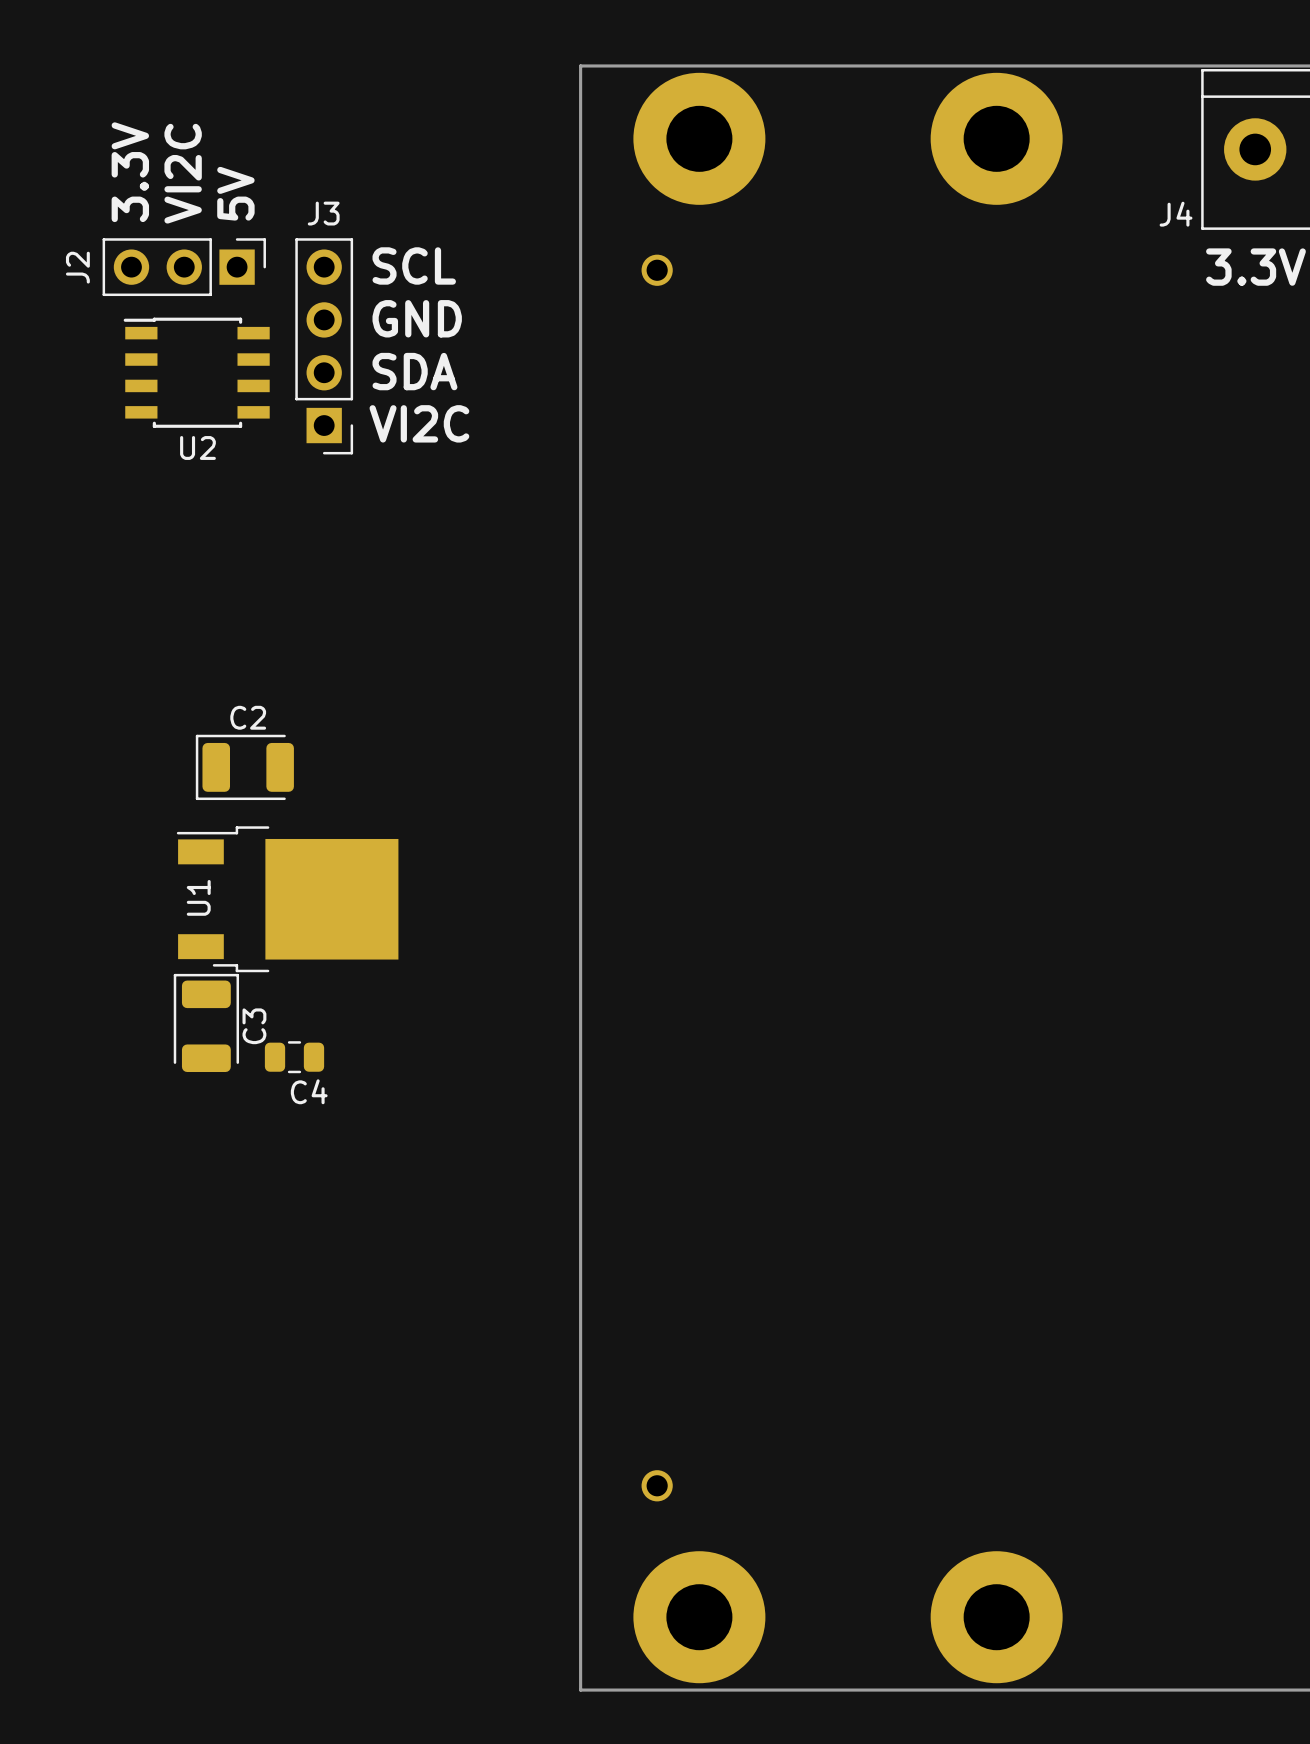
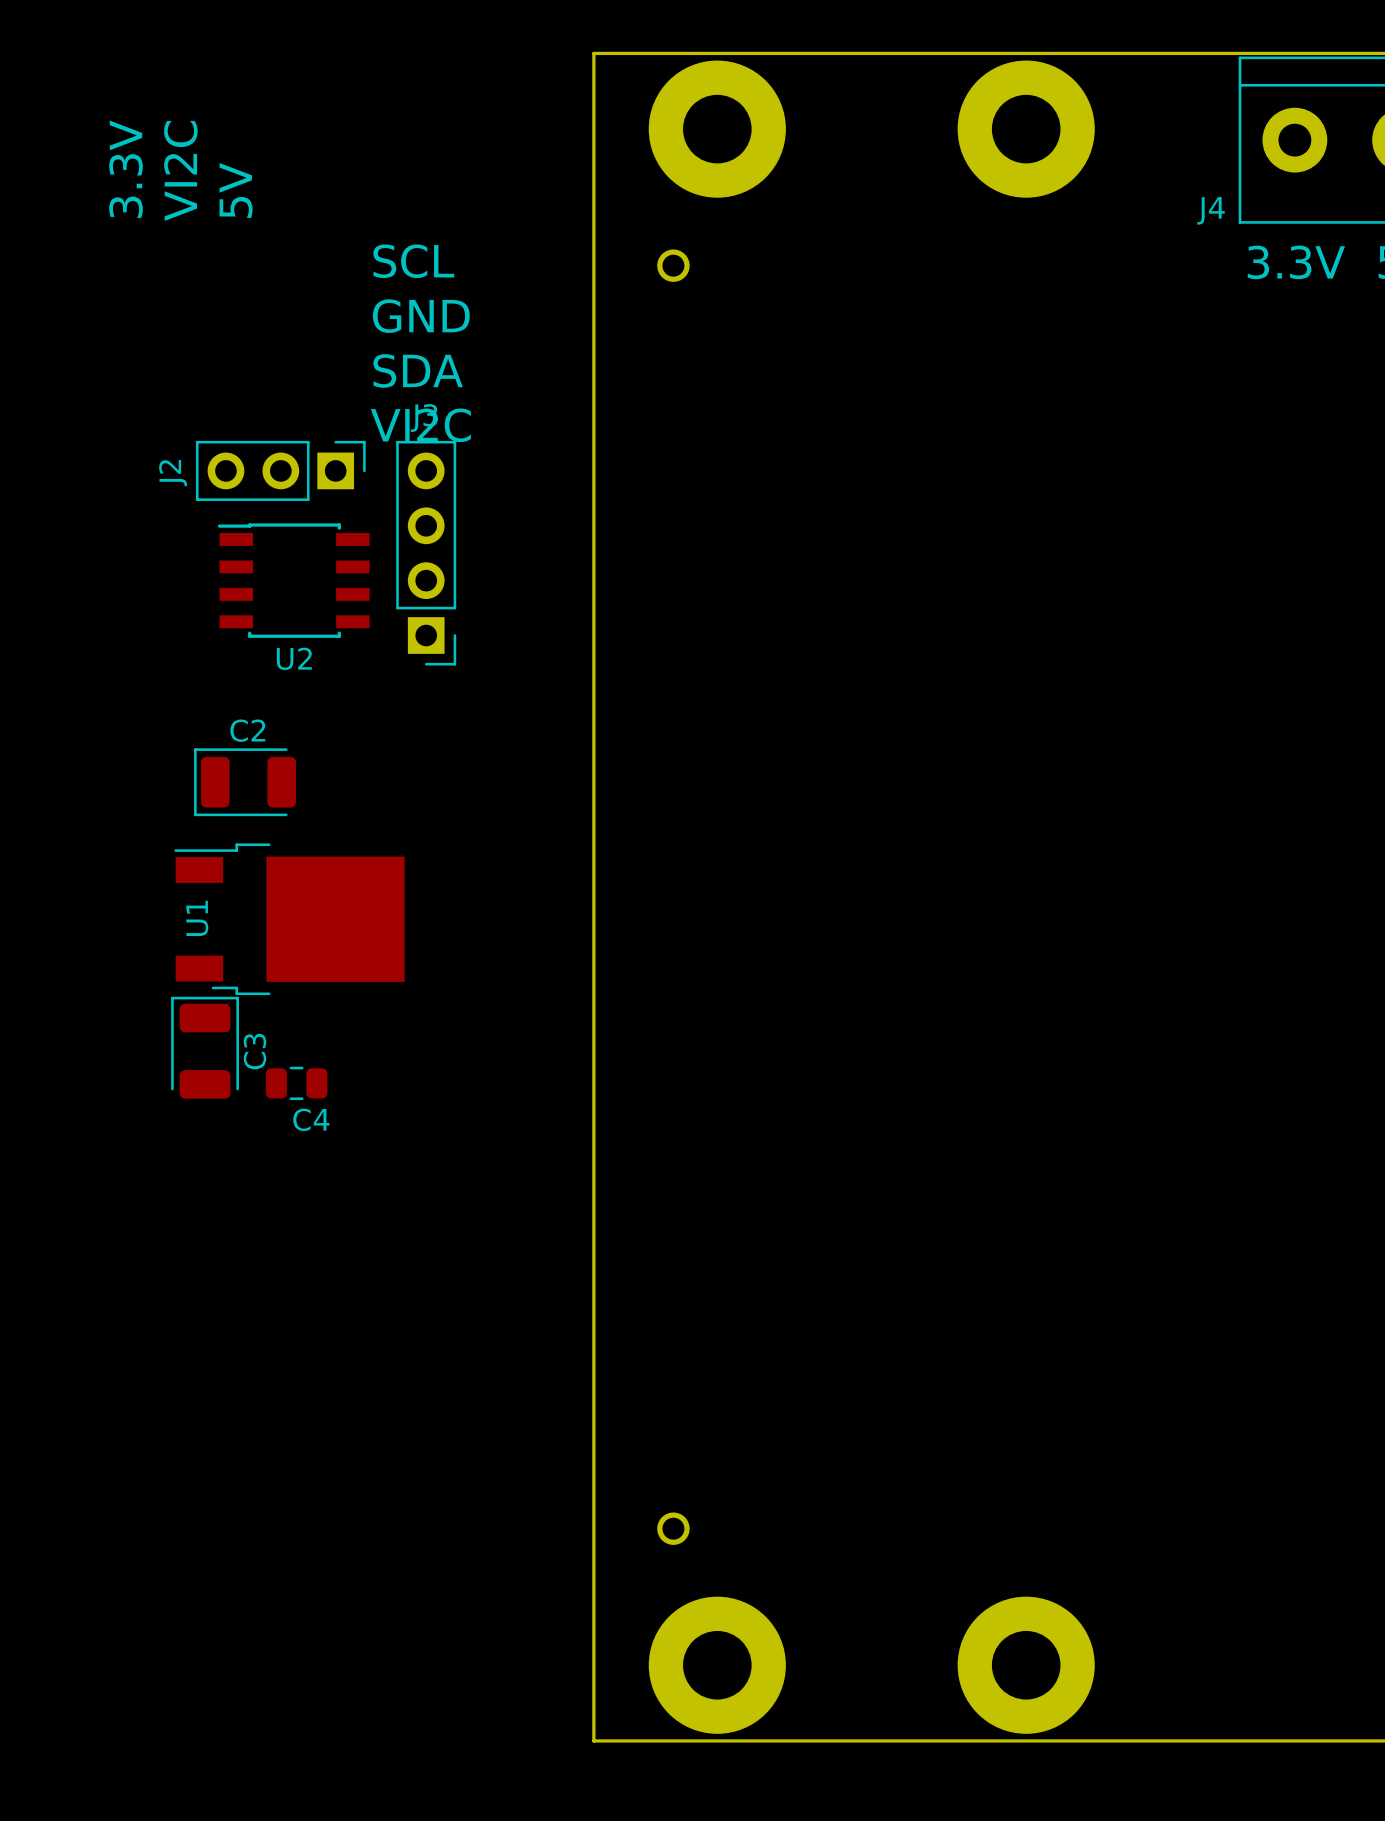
J2 position: (184, 267) -> (280, 470)
J3 position: (324, 346) -> (426, 553)
U2 position: (196, 372) -> (293, 580)

